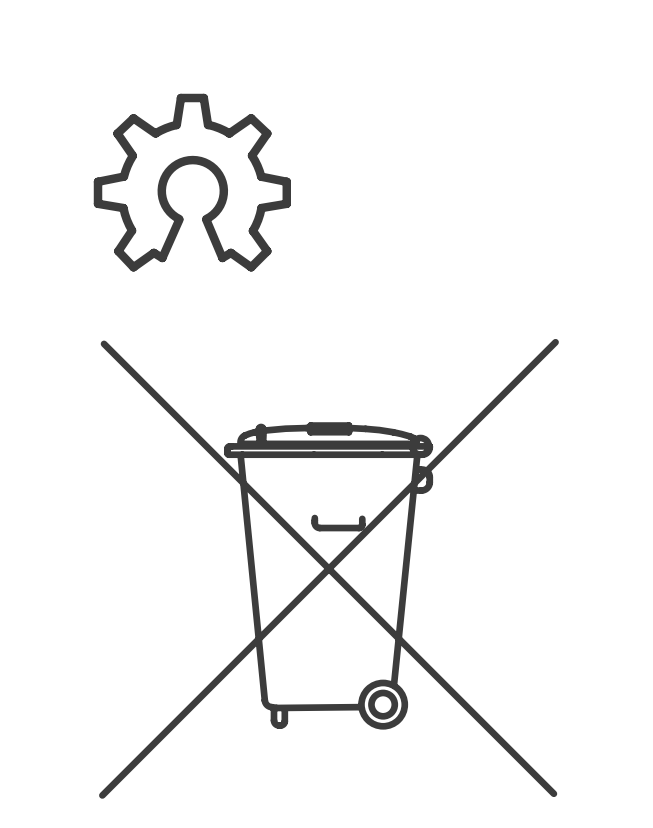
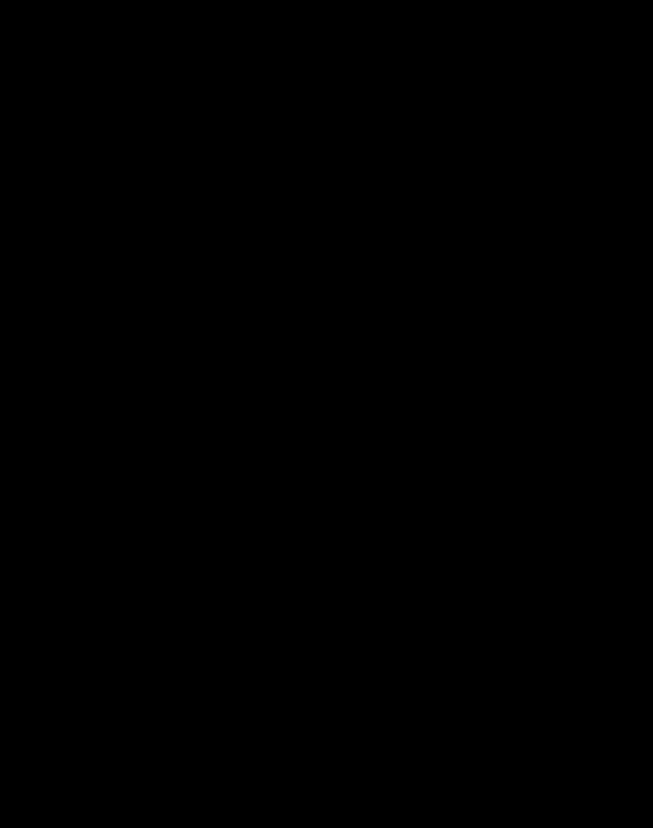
drawing: [93, 93, 292, 272] -> none
drawing: [99, 338, 559, 799] -> none

